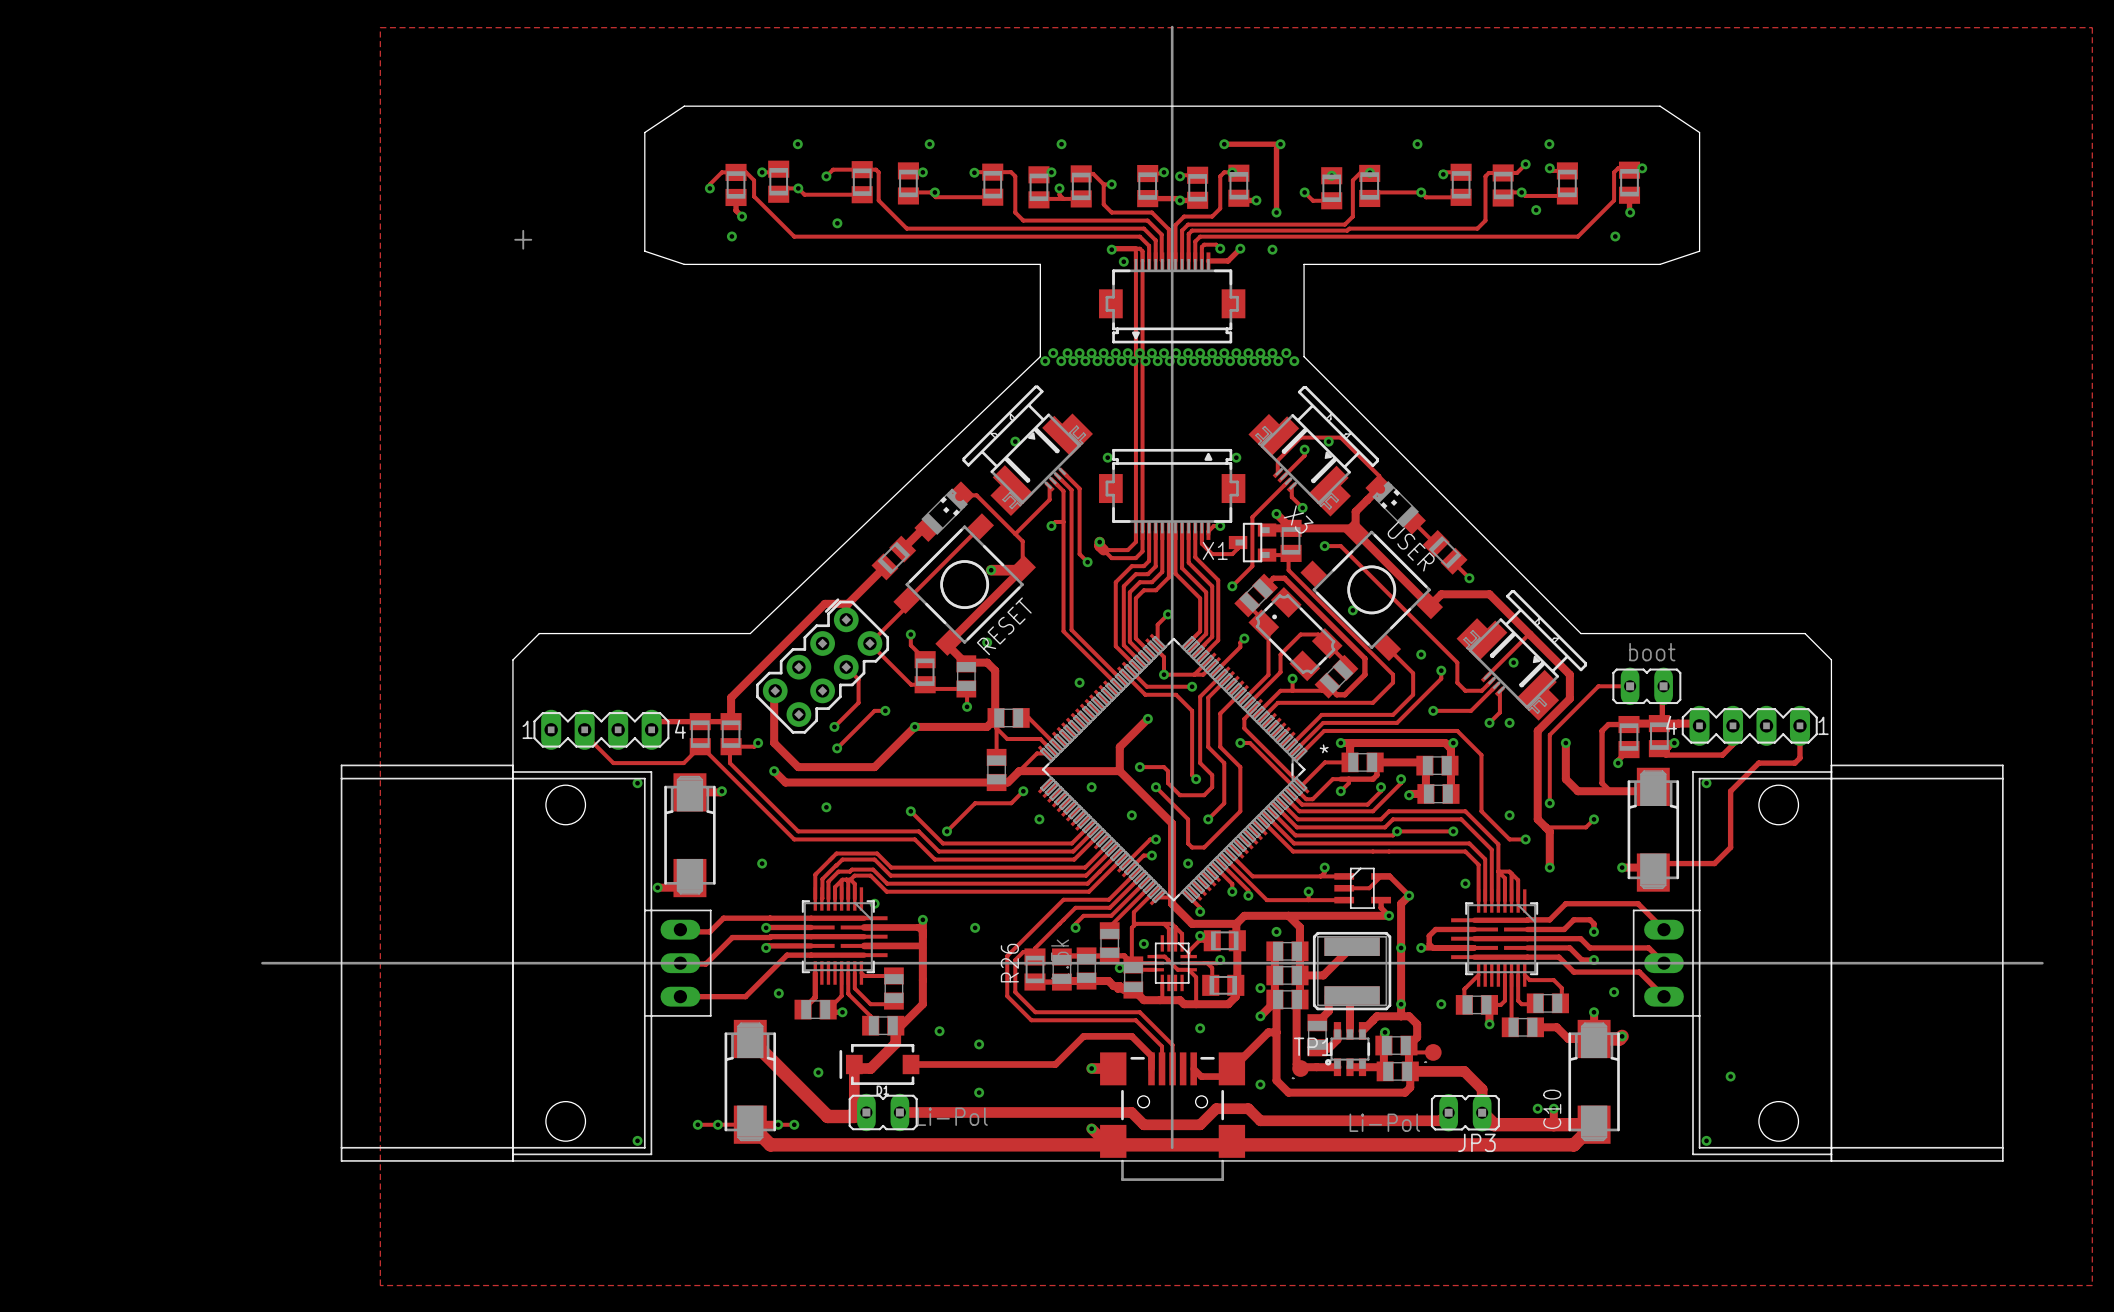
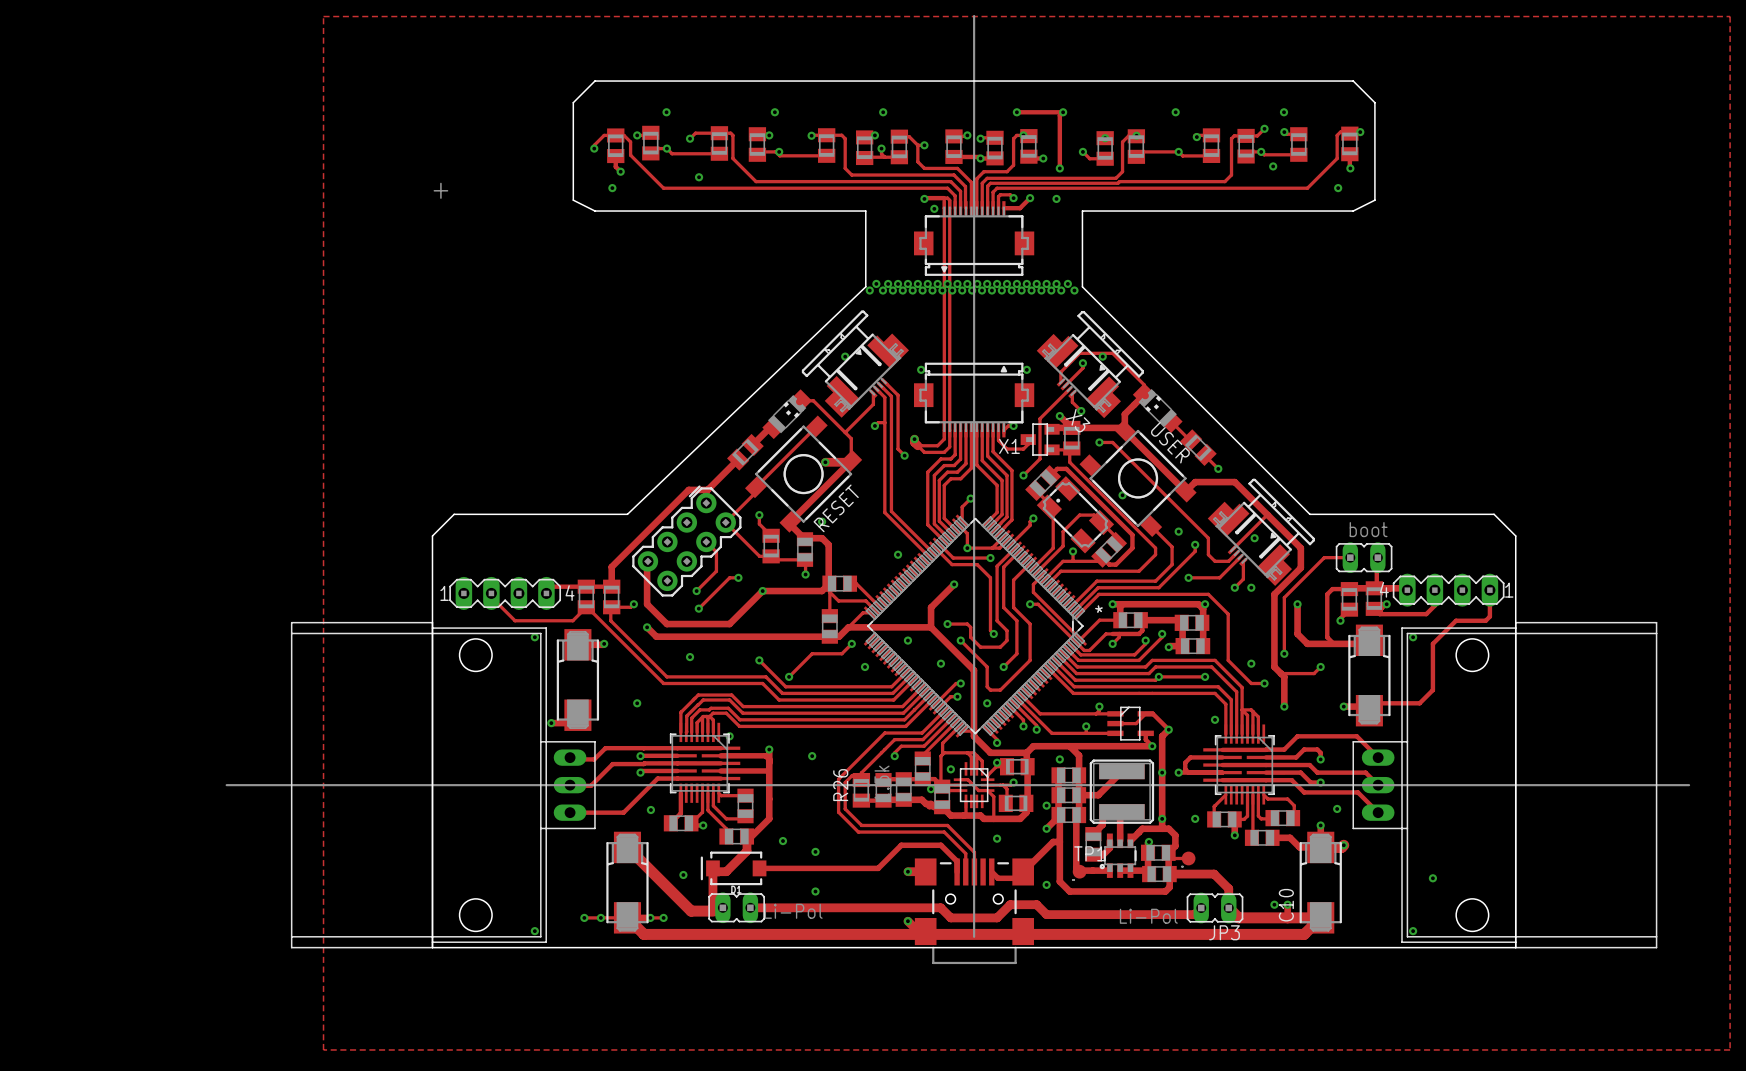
board edge: (710, 106) (684, 106) (644, 132) (644, 251) (684, 264) (710, 264) -> (594, 81) (573, 102) (573, 200) (594, 211)
board edge: (1633, 106) (1660, 106) (1699, 132) (1699, 251) (1660, 264) (1633, 264) -> (1353, 81) (1374, 102) (1374, 200) (1353, 211)

